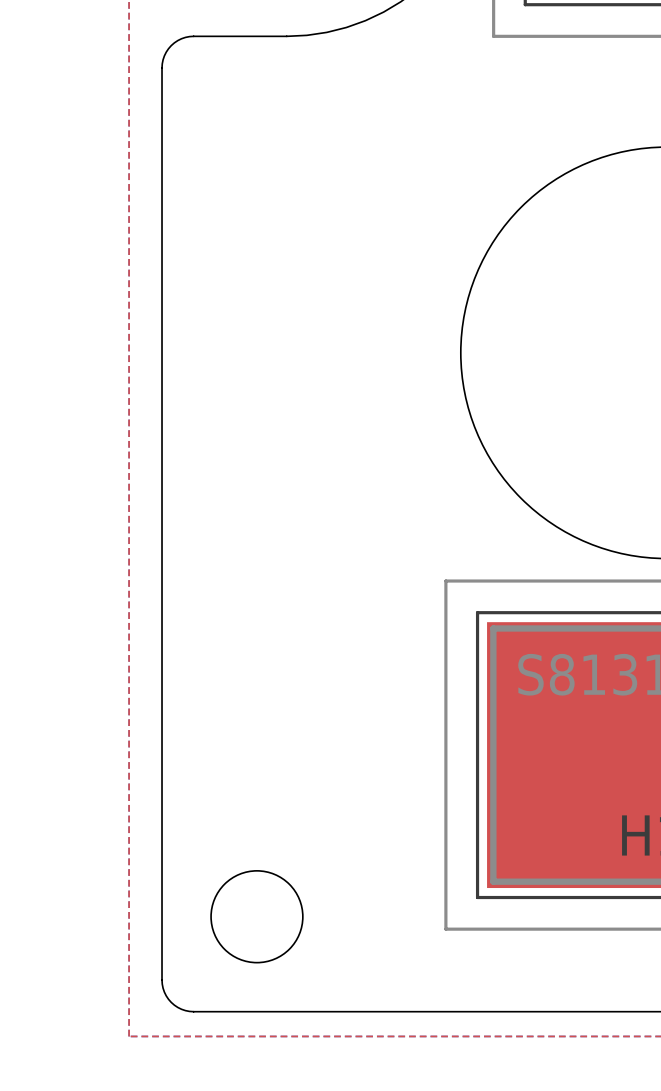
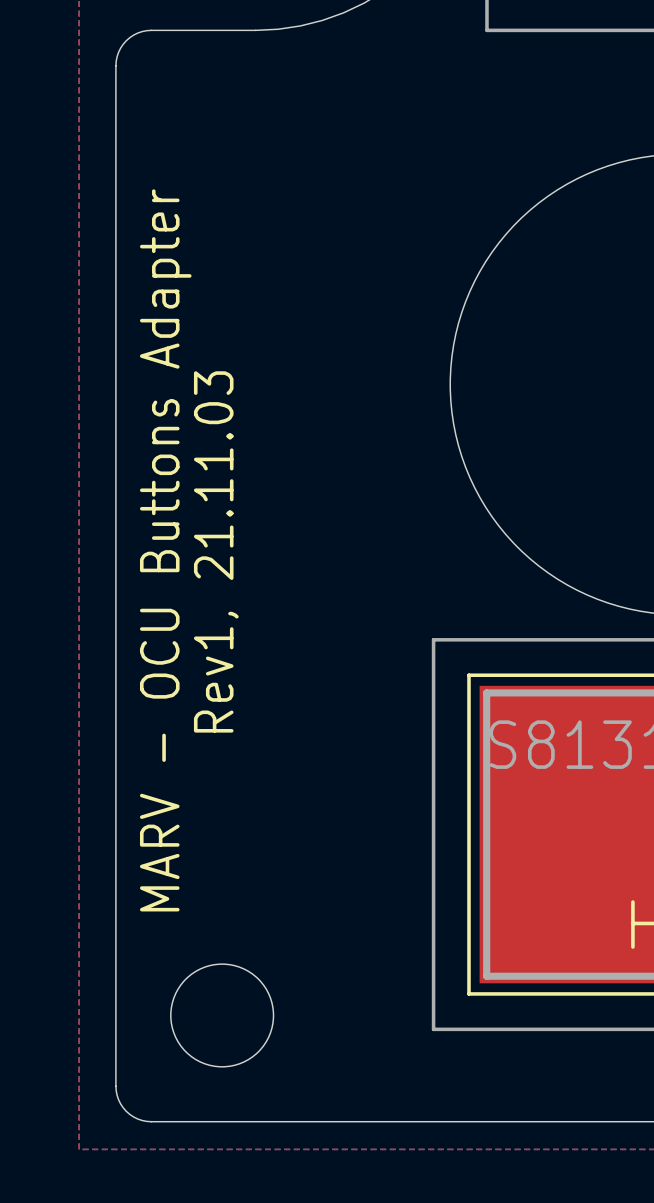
text: none -> MARV - OCU Buttons Adapter (165, 550)
text: none -> Rev1, 21.11.03 (216, 551)

